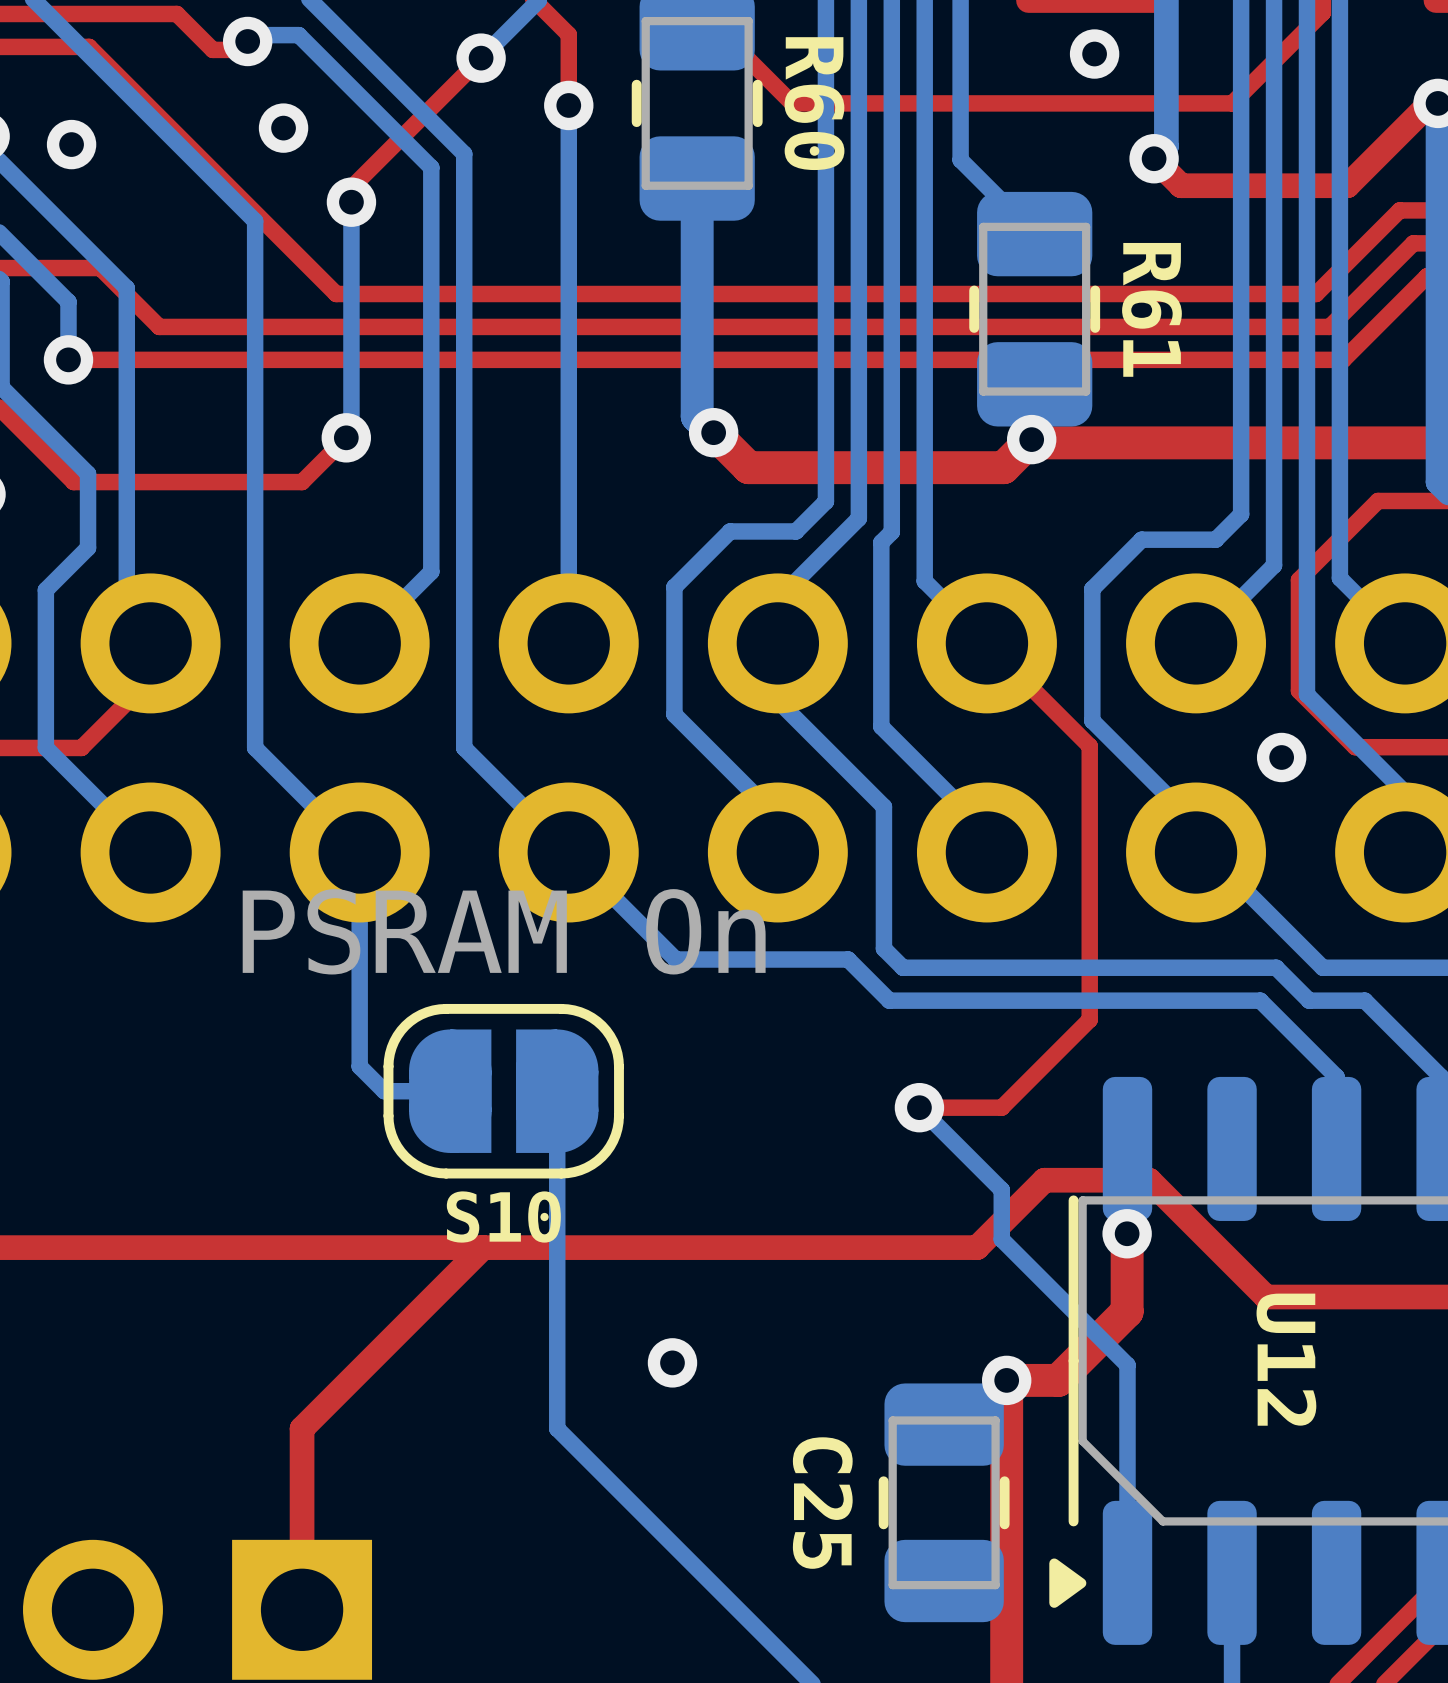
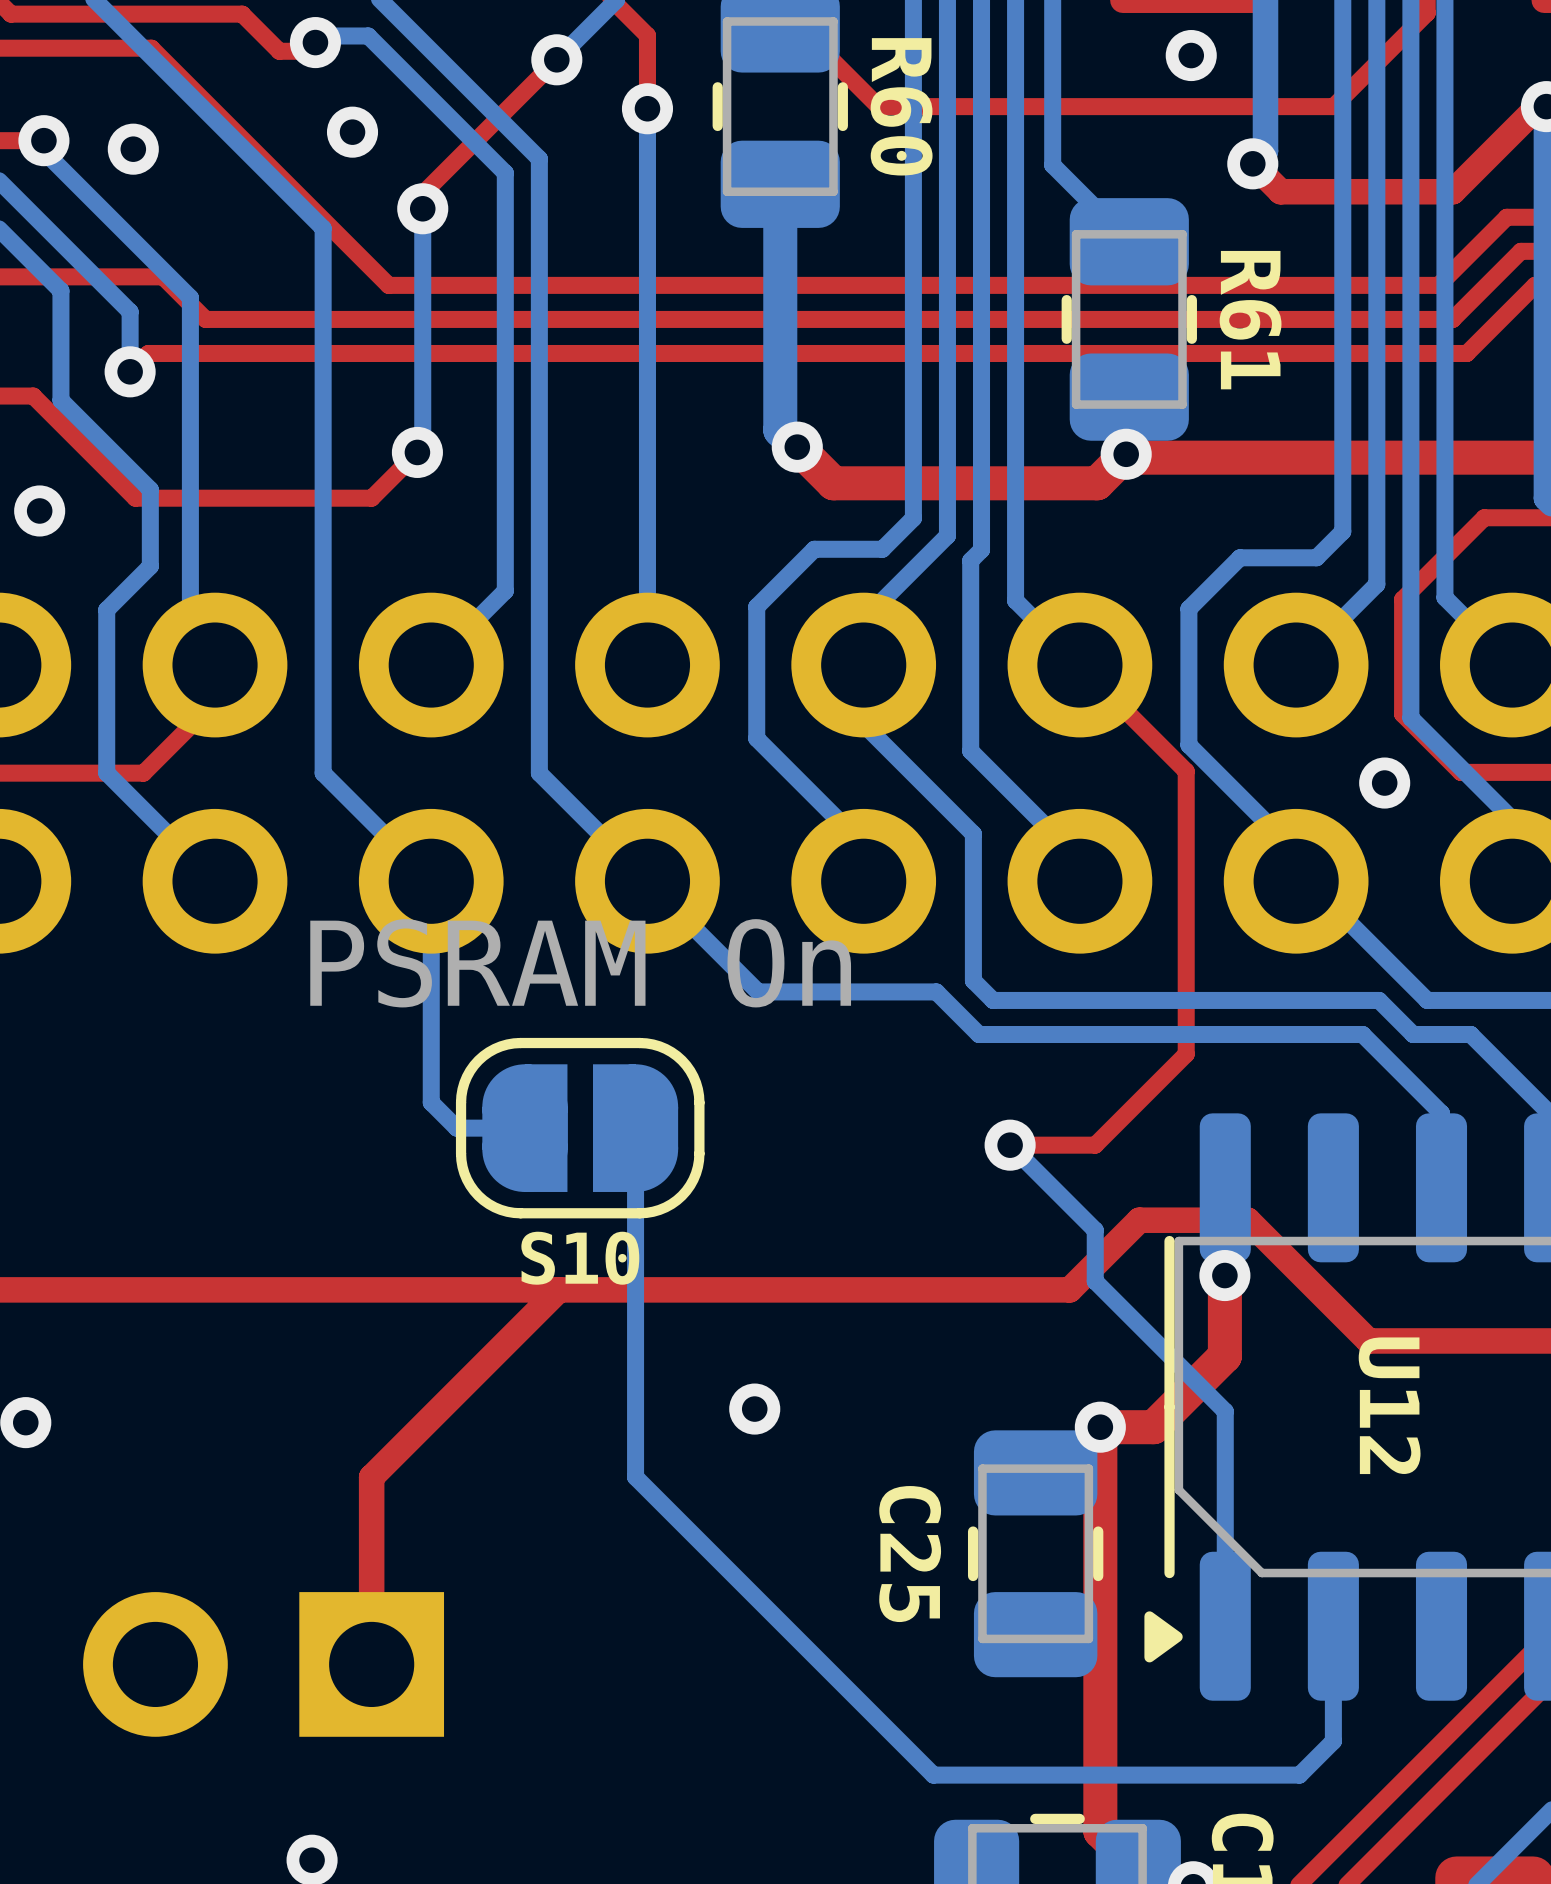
top track: (1333, 276) (1316, 294) (336, 294) (318, 276) -> (1438, 285) (388, 285)
top track: (1347, 309) (1329, 326) (159, 326) (141, 309) -> (1452, 319) (205, 319)
top track: (1361, 342) (1343, 359) (68, 359) -> (1466, 353) (148, 353) (130, 371)

